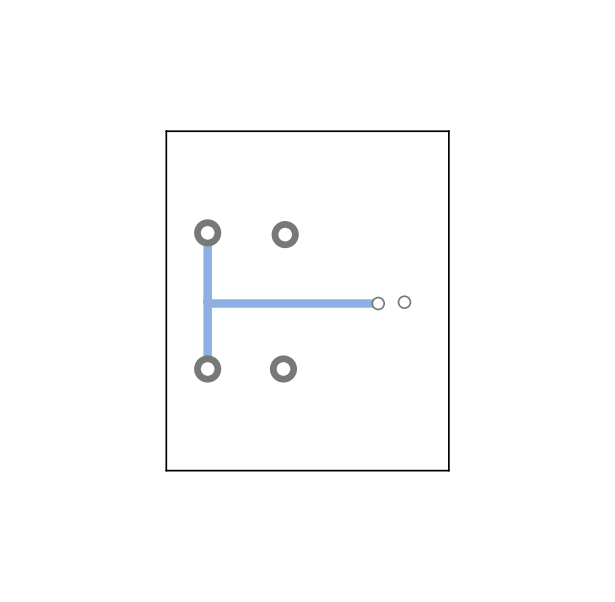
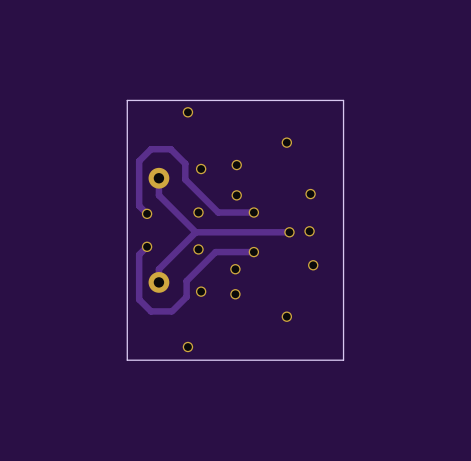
via: none -> (187, 112)
via: none -> (286, 142)
via: none -> (236, 165)
via: none -> (201, 169)
via: (285, 234) -> none
via: none -> (310, 194)
track: (207, 255) (207, 351) -> (158, 195) (195, 232) (158, 269)
via: none -> (236, 195)
via: none -> (198, 212)
track: none -> (253, 212) (218, 212) (185, 179) (185, 163) (170, 149) (151, 149) (139, 161) (139, 205) (147, 213)
via: none -> (253, 212)
via: none -> (147, 213)
track: (207, 301) (209, 303) (255, 303) -> none
track: none -> (147, 246) (139, 254) (139, 299) (151, 311) (170, 311)
via: none -> (147, 246)
via: none -> (198, 249)
track: none -> (253, 252) (215, 252) (186, 281) (186, 296) (172, 311)
via: none -> (253, 252)
via: none -> (313, 265)
via: none -> (235, 269)
via: (283, 368) -> none
via: none -> (201, 291)
via: none -> (235, 294)
via: none -> (286, 316)
via: none -> (187, 347)

